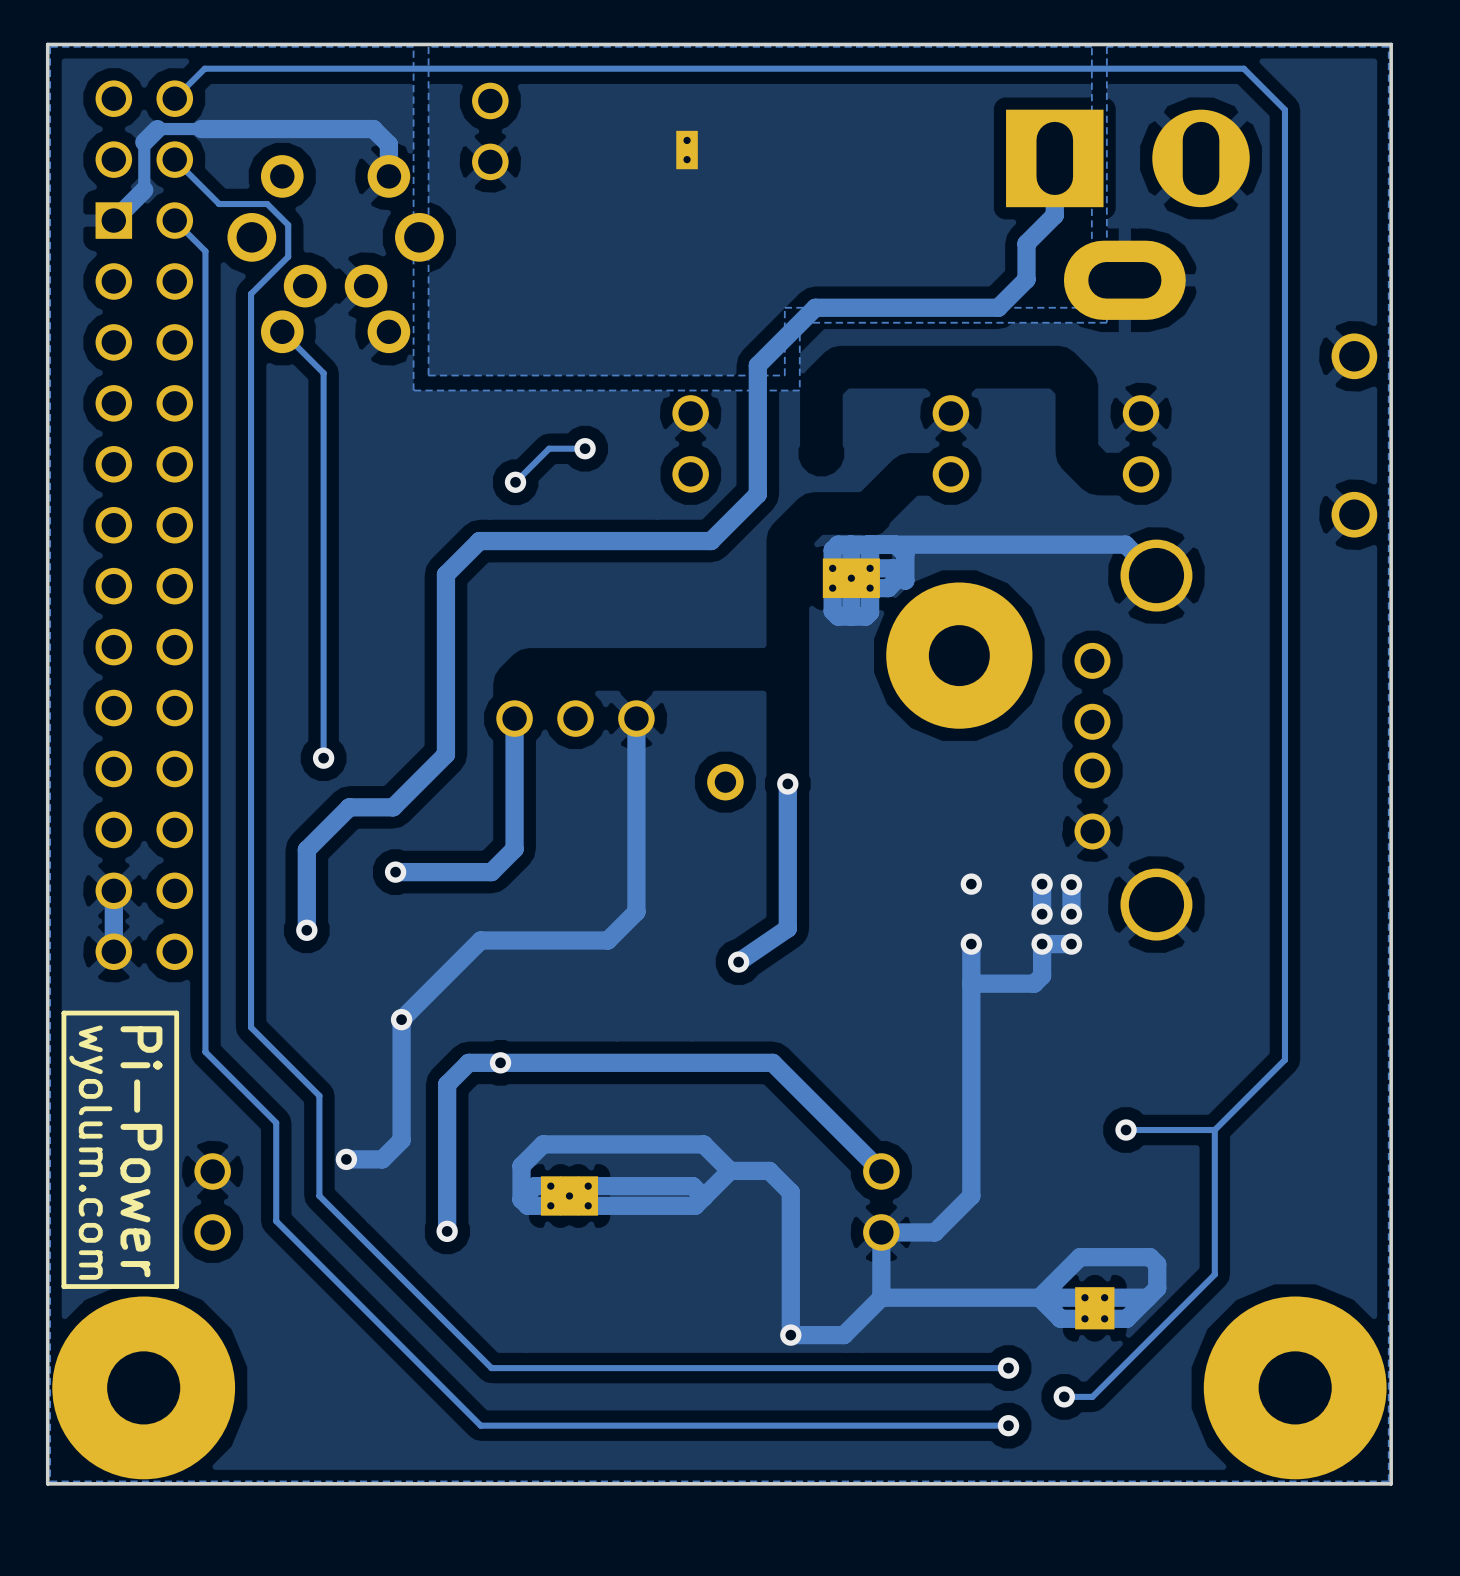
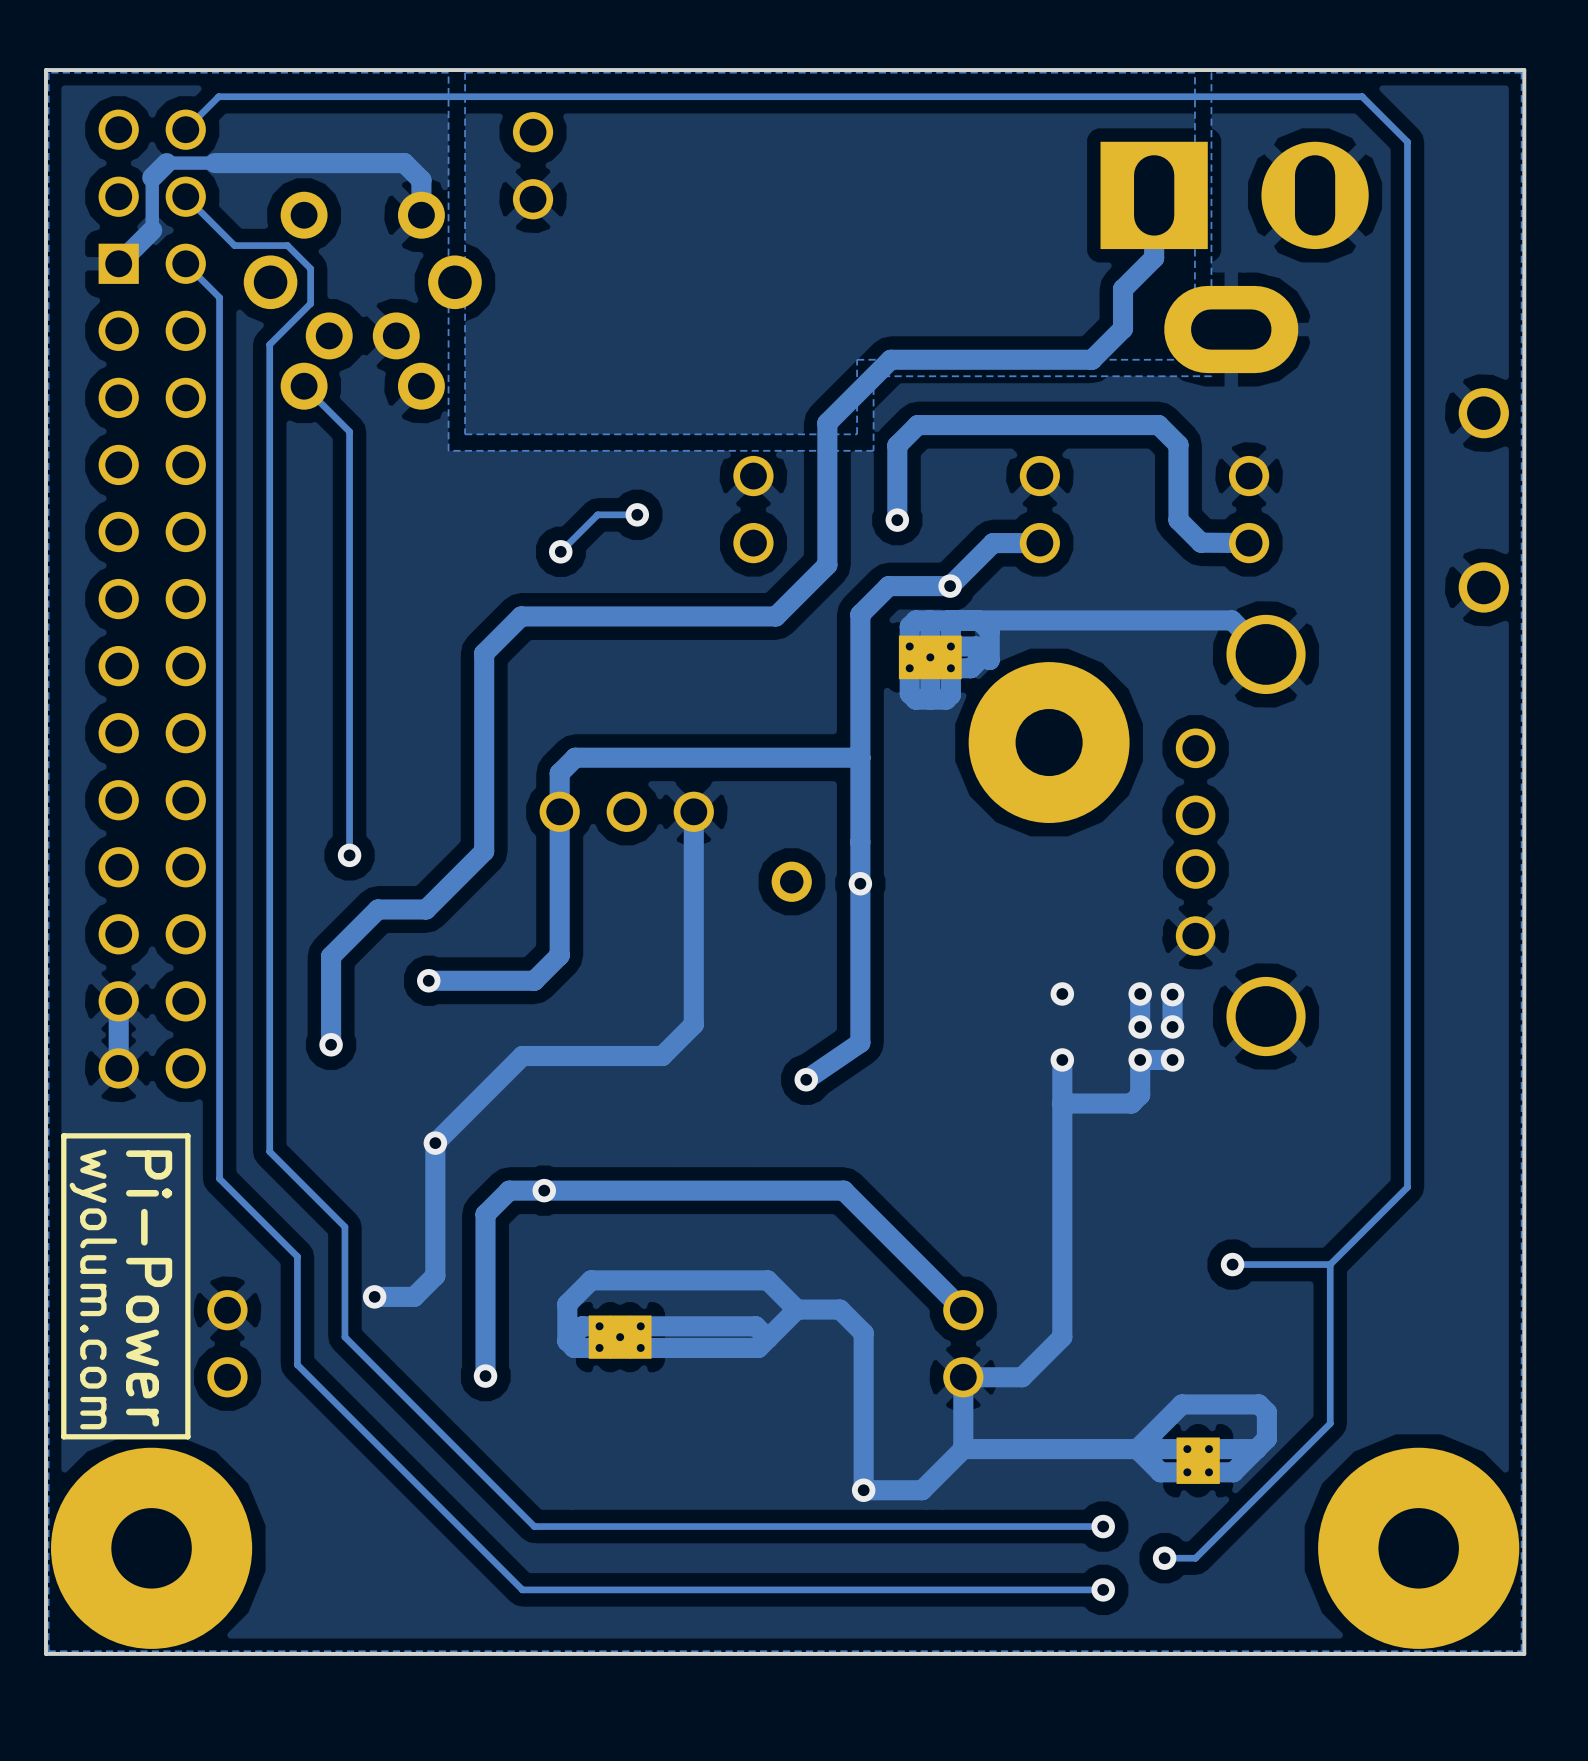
part: (687, 150) -> none
track: none -> (897, 520) (897, 445) (917, 425) (1158, 425) (1178, 444) (1178, 520) (1200, 542) (1249, 543)
via: none -> (897, 520)
track: none -> (1039, 543) (993, 543) (950, 586) (888, 586) (860, 614) (860, 883)
via: none -> (950, 586)
track: none -> (860, 757) (575, 757) (559, 773) (559, 811)

